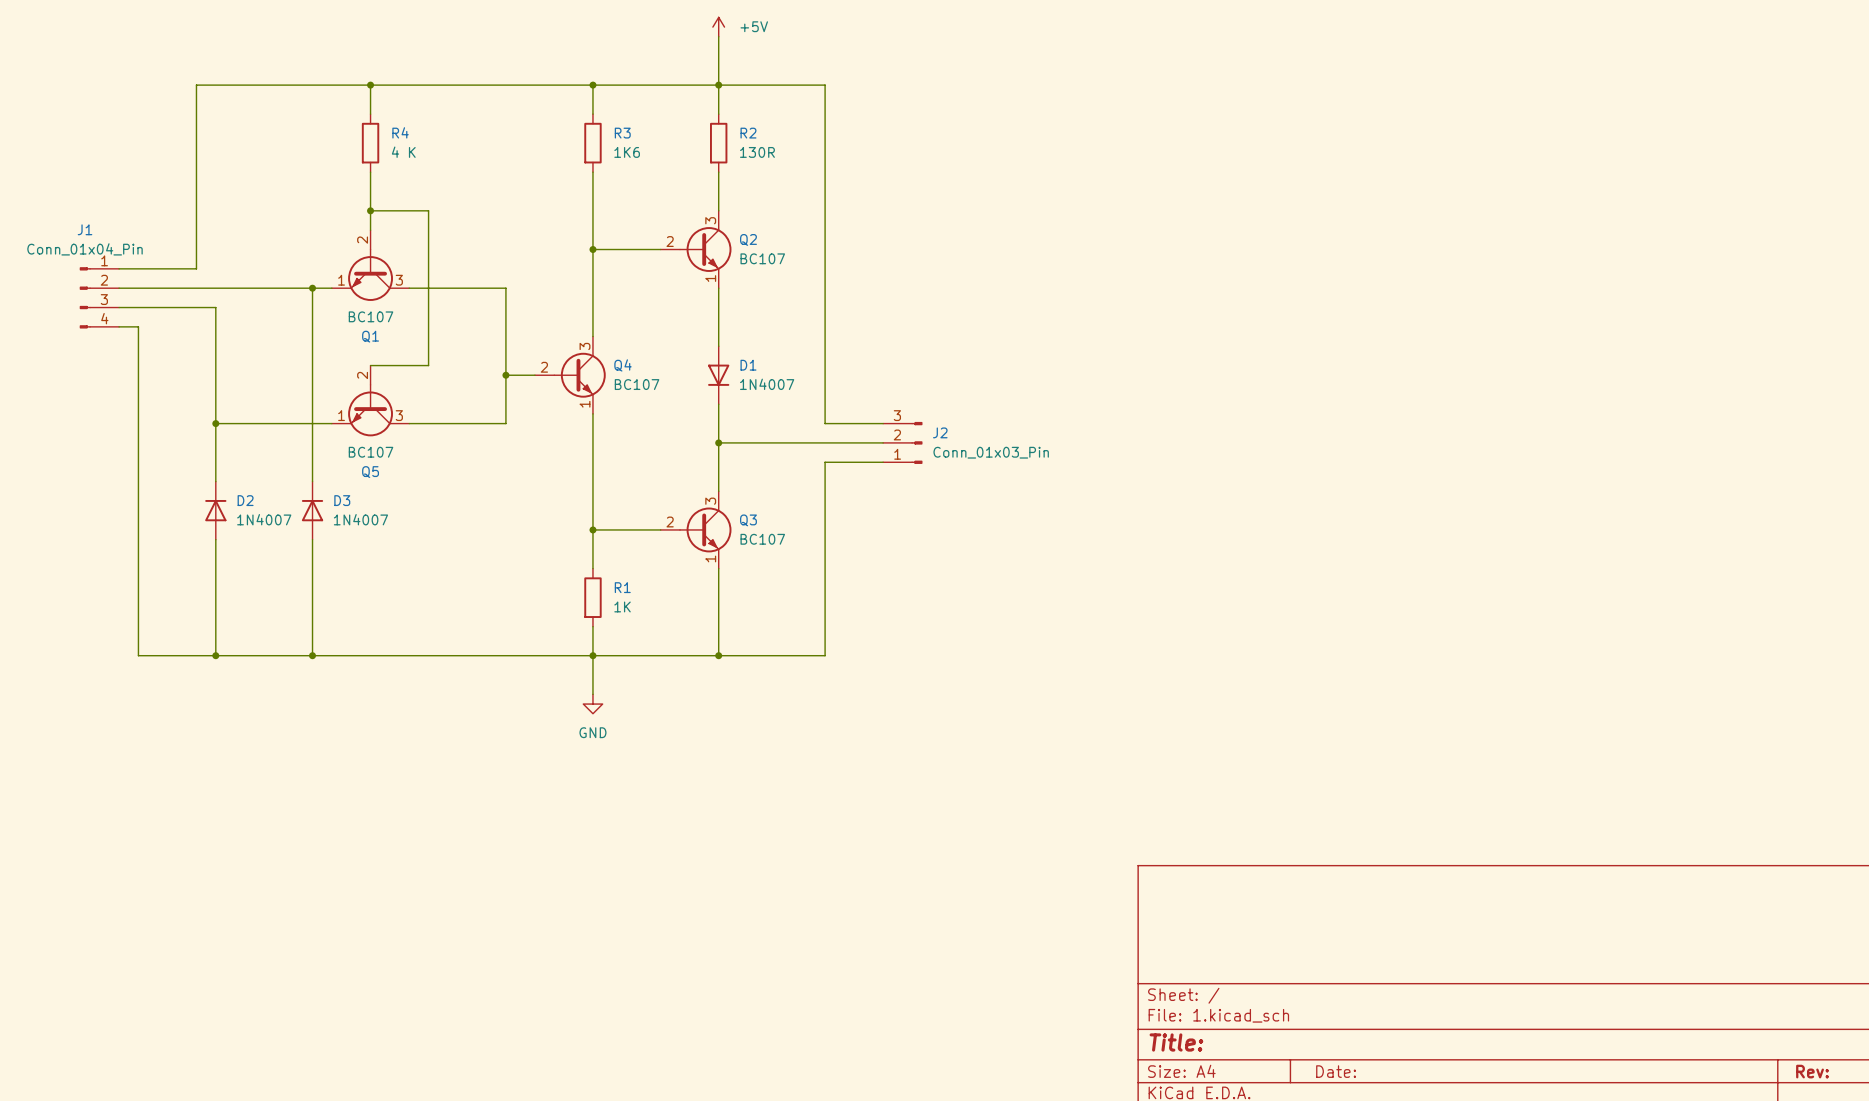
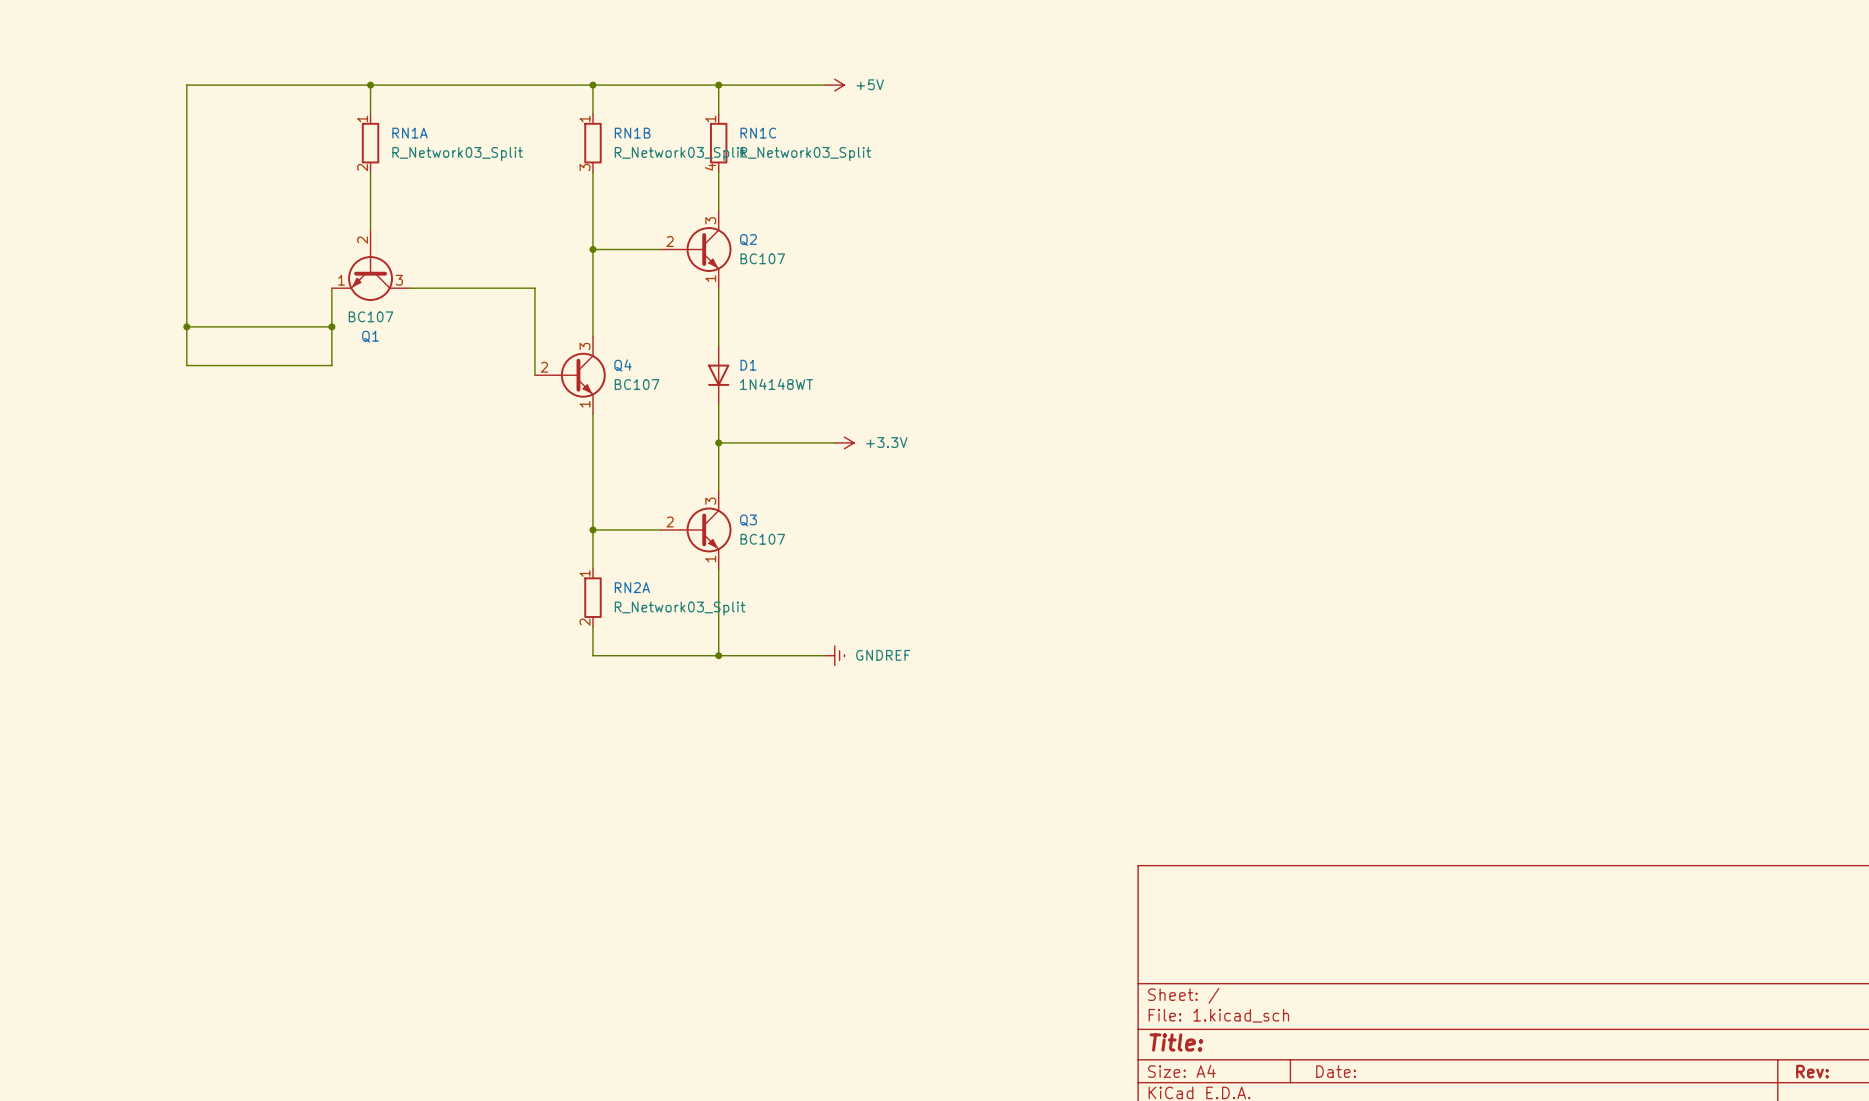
power symbol rotation: 0° (718, 27) -> 90° clockwise (834, 85)
power symbol position: +5V (718, 27) -> +5V (834, 85)
wire: (718, 36) (718, 85) -> none
wire: (196, 85) (196, 268) (119, 268) -> (196, 85) (186, 85) (186, 365) (331, 365) (331, 288)
wire: (825, 85) (825, 423) (883, 423) -> none
R4 pin number: none -> 1 (362, 118)
R3 pin number: none -> 1 (585, 118)
R2 pin number: none -> 1 (710, 118)
R4 name: R4 (400, 132) -> RN1A (409, 133)
R3 name: R3 (622, 133) -> RN1B (632, 133)
R2 name: R2 (748, 133) -> RN1C (758, 133)
R4 value: 4 K (403, 152) -> R_Network03_Split (457, 154)
R3 value: 1K6 (627, 152) -> R_Network03_Split (680, 154)
R2 value: 130R (757, 152) -> R_Network03_Split (805, 154)
R4 pin number: none -> 2 (362, 167)
R3 pin number: none -> 3 (585, 167)
R2 pin number: none -> 4 (710, 167)
wire: (370, 210) (428, 210) (428, 365) (370, 365) -> none
junction: (370, 210) -> none
wire: (119, 288) (331, 288) -> none
wire: (312, 288) (312, 481) -> none
junction position: (312, 288) -> (331, 326)
wire: (505, 288) (505, 423) (409, 423) -> none
J1: Conn_01x04_Pin (99, 297) -> none
wire: (119, 307) (215, 307) (215, 481) -> none
wire: (119, 326) (138, 326) (138, 655) (592, 655) (592, 694) -> none
wire: none -> (186, 326) (331, 326)
junction: none -> (186, 326)
wire: (505, 375) (534, 375) -> (505, 288) (534, 288) (534, 375)
junction: (505, 375) -> none
D1 value: 1N4007 (767, 384) -> 1N4148WT (776, 384)
Q5: BC107 (370, 400) -> none
wire: (215, 423) (331, 423) -> none
junction: (215, 423) -> none
wire: (834, 442) (883, 442) -> none
power symbol: none -> +3.3V (844, 442)
J2: Conn_01x03_Pin (902, 442) -> none
wire: (883, 462) (825, 462) (825, 655) -> none
D2: 1N4007 (215, 510) -> none
D3: 1N4007 (312, 510) -> none
wire: (215, 539) (215, 655) -> none
wire: (312, 539) (312, 655) -> none
R1 pin number: none -> 1 (585, 573)
R1 name: R1 (622, 587) -> RN2A (632, 587)
R1 value: 1K (622, 606) -> R_Network03_Split (680, 608)
R1 pin number: none -> 2 (585, 622)
junction: (215, 655) -> none
junction: (312, 655) -> none
junction: (592, 655) -> none
power symbol: none -> GNDREF (834, 655)
power symbol: GND (592, 704) -> none

